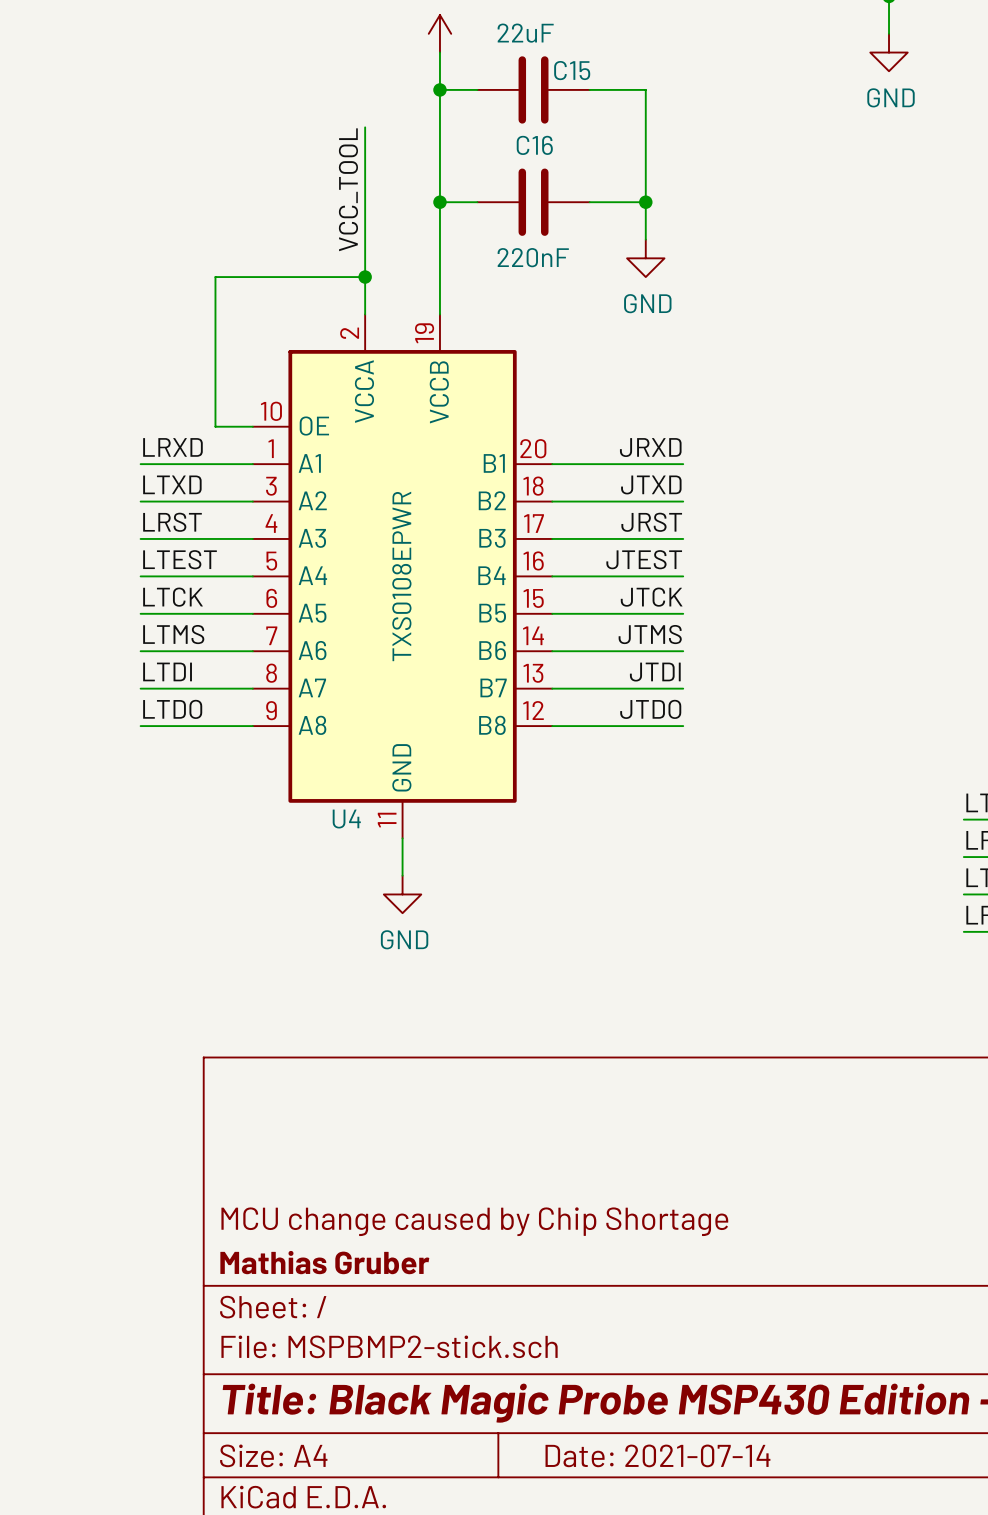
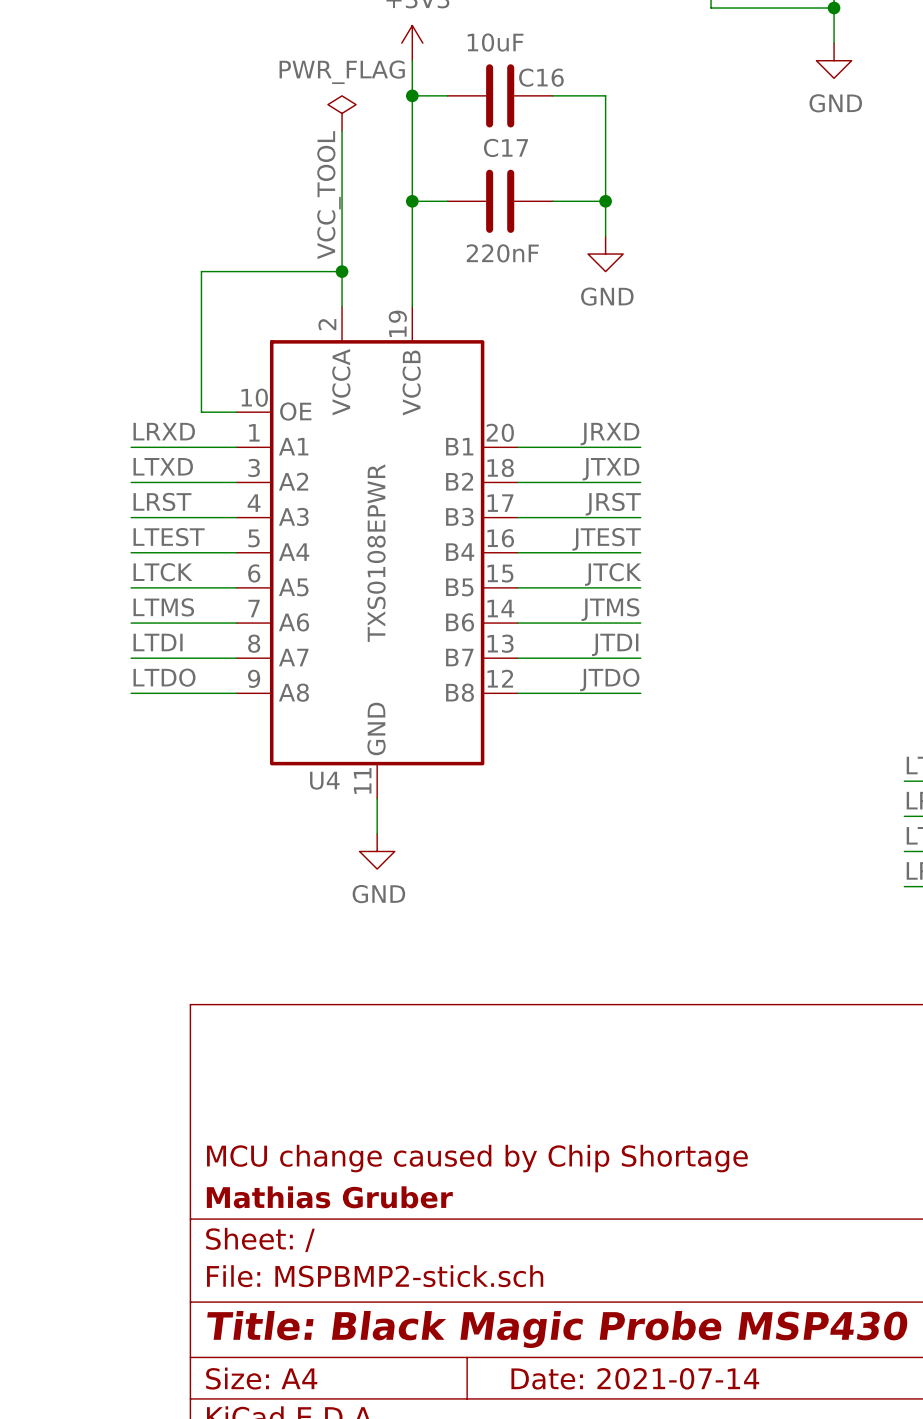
C15 value: 22uF (525, 33) -> 10uF (495, 42)
C15 name: C15 (572, 70) -> C16 (541, 77)
power symbol: none -> PWR_FLAG (342, 113)
C16 name: C16 (534, 145) -> C17 (505, 147)

